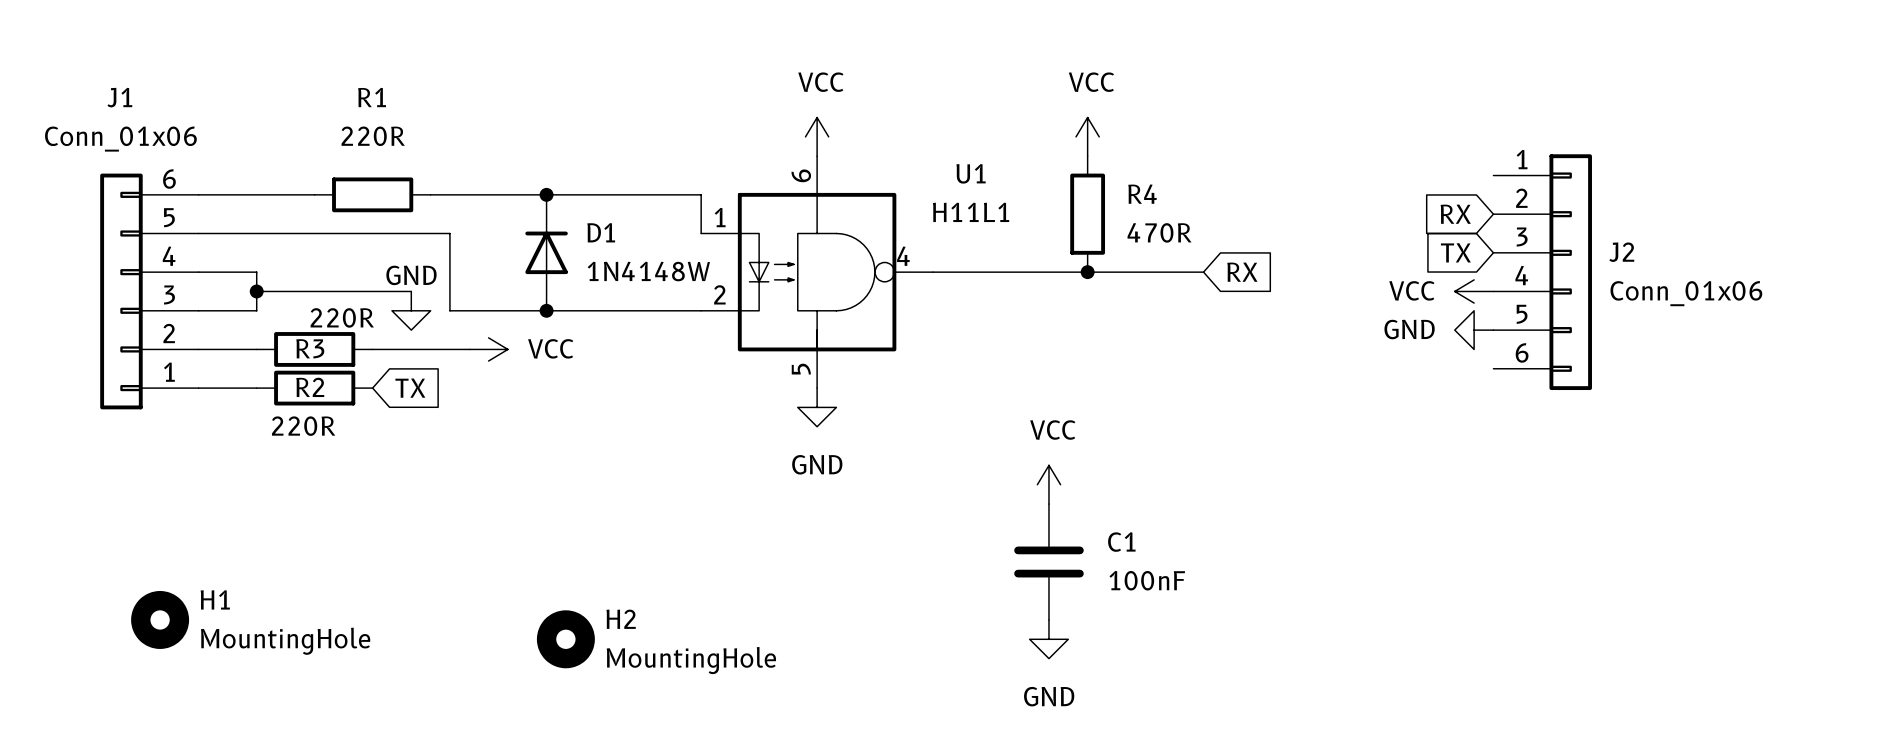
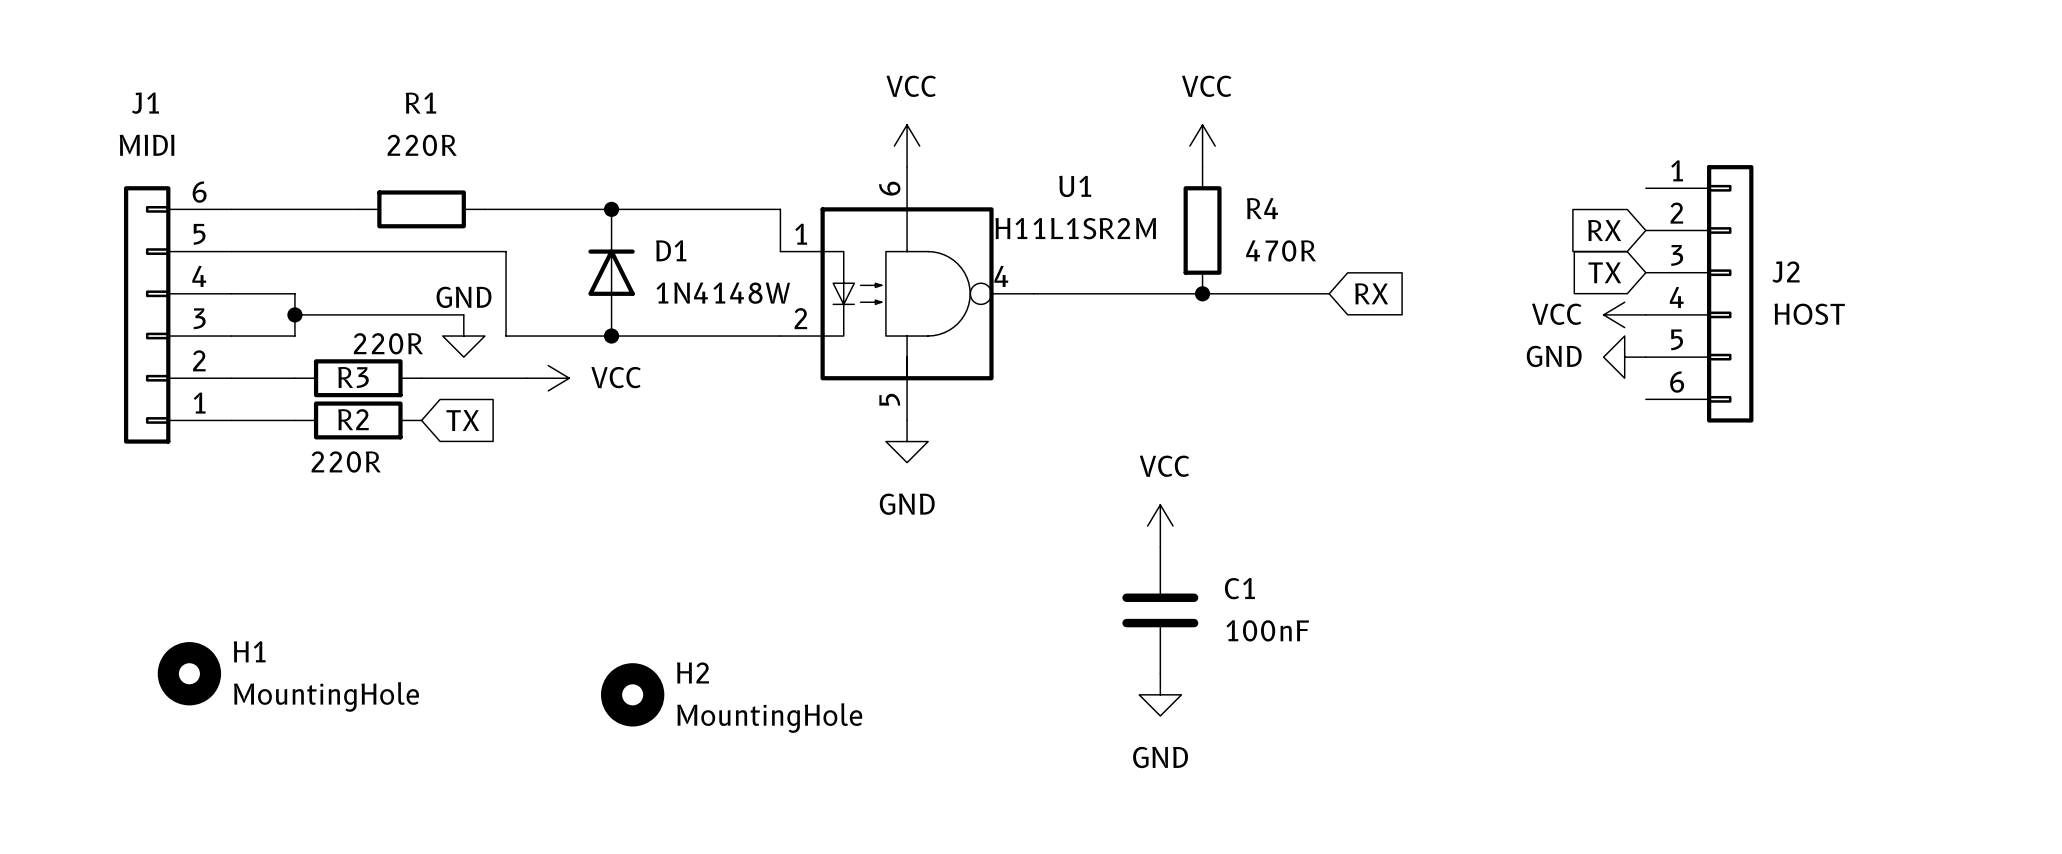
J1 value: Conn_01x06 (120, 139) -> MIDI (147, 145)
U1 value: H11L1 (971, 212) -> H11L1SR2M (1075, 228)
J2 value: Conn_01x06 (1686, 293) -> HOST (1809, 314)

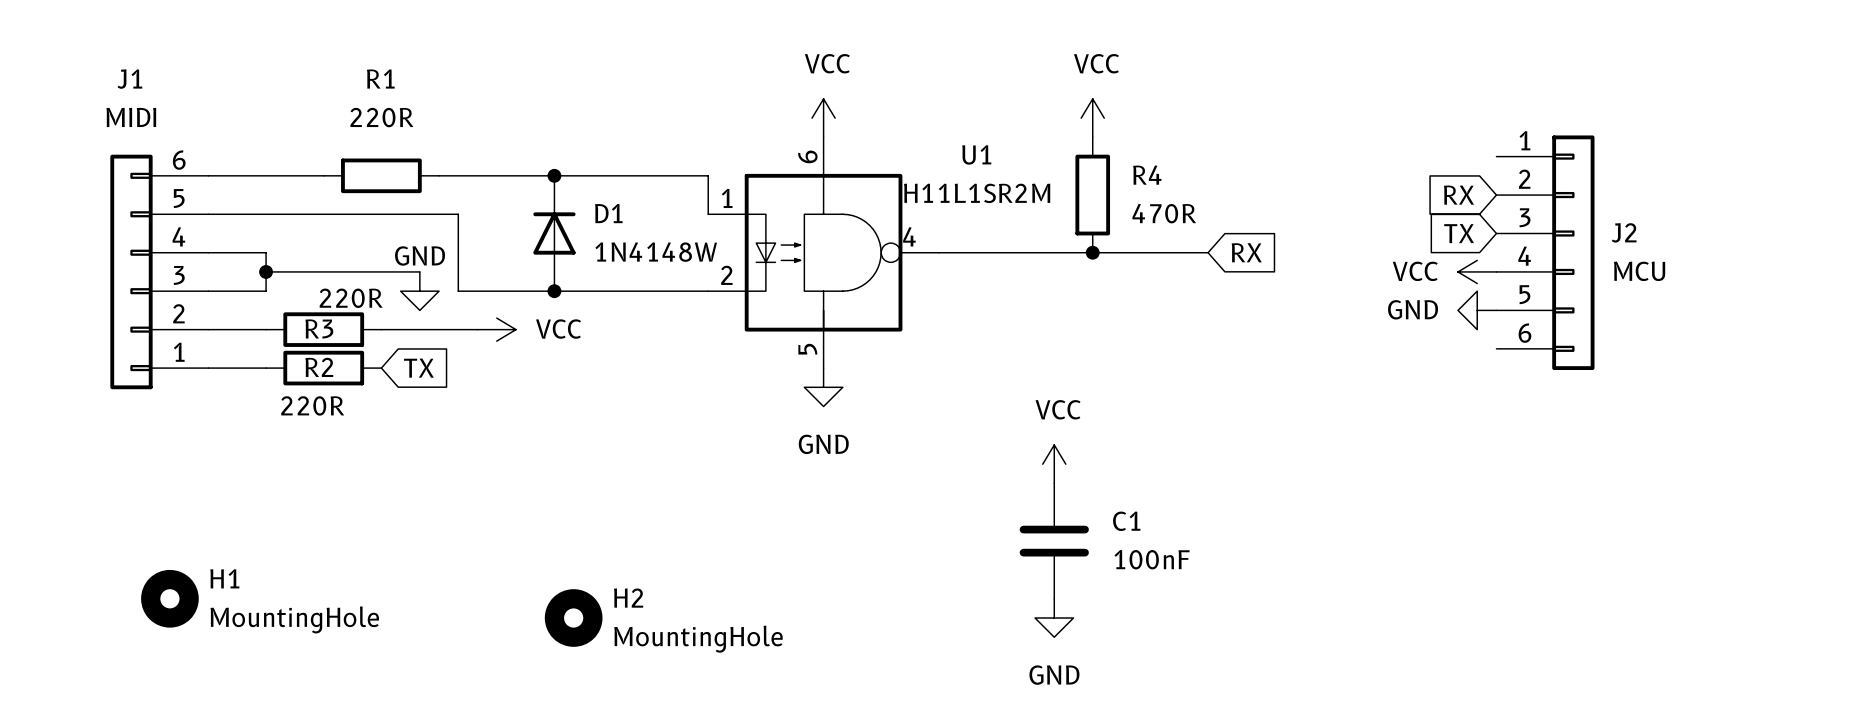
J2 value: HOST (1809, 314) -> MCU (1639, 271)

